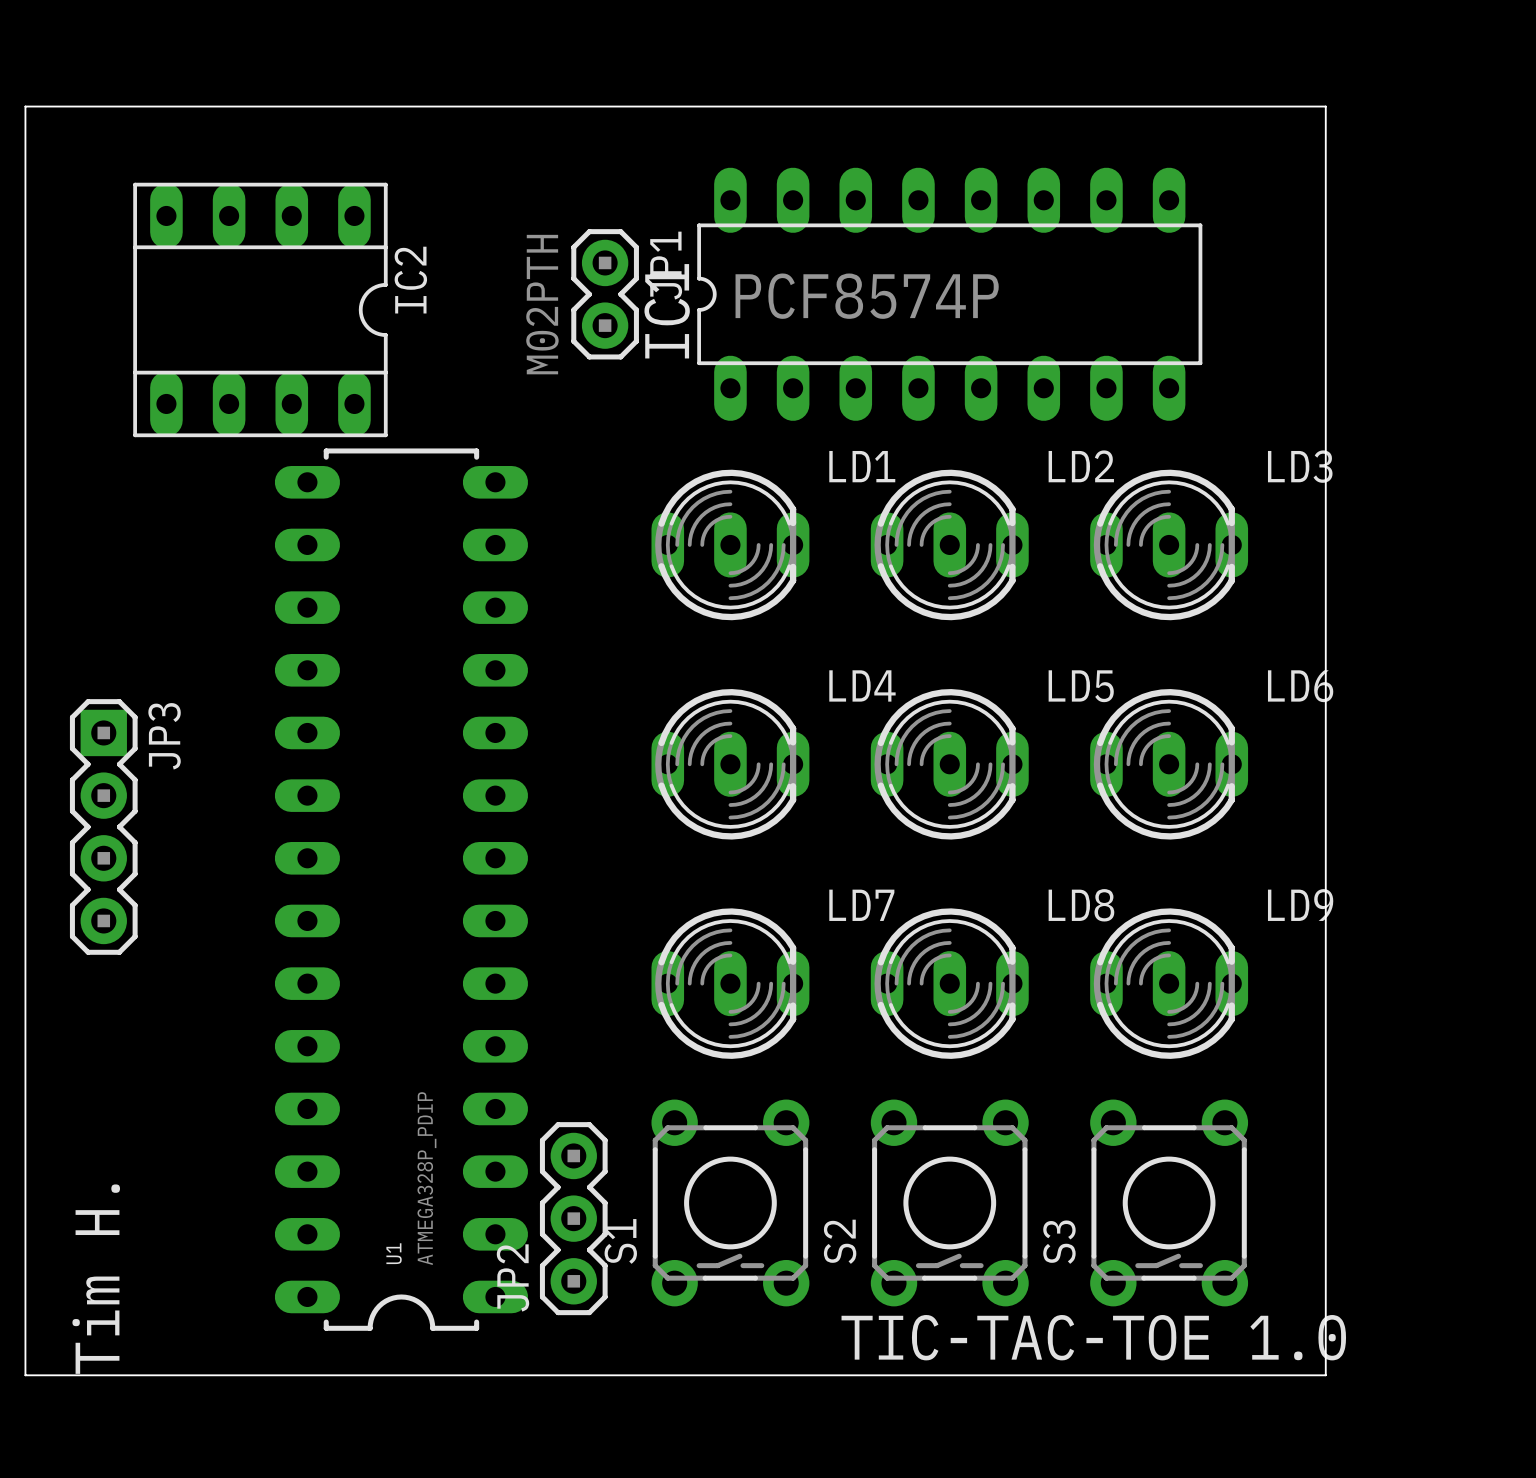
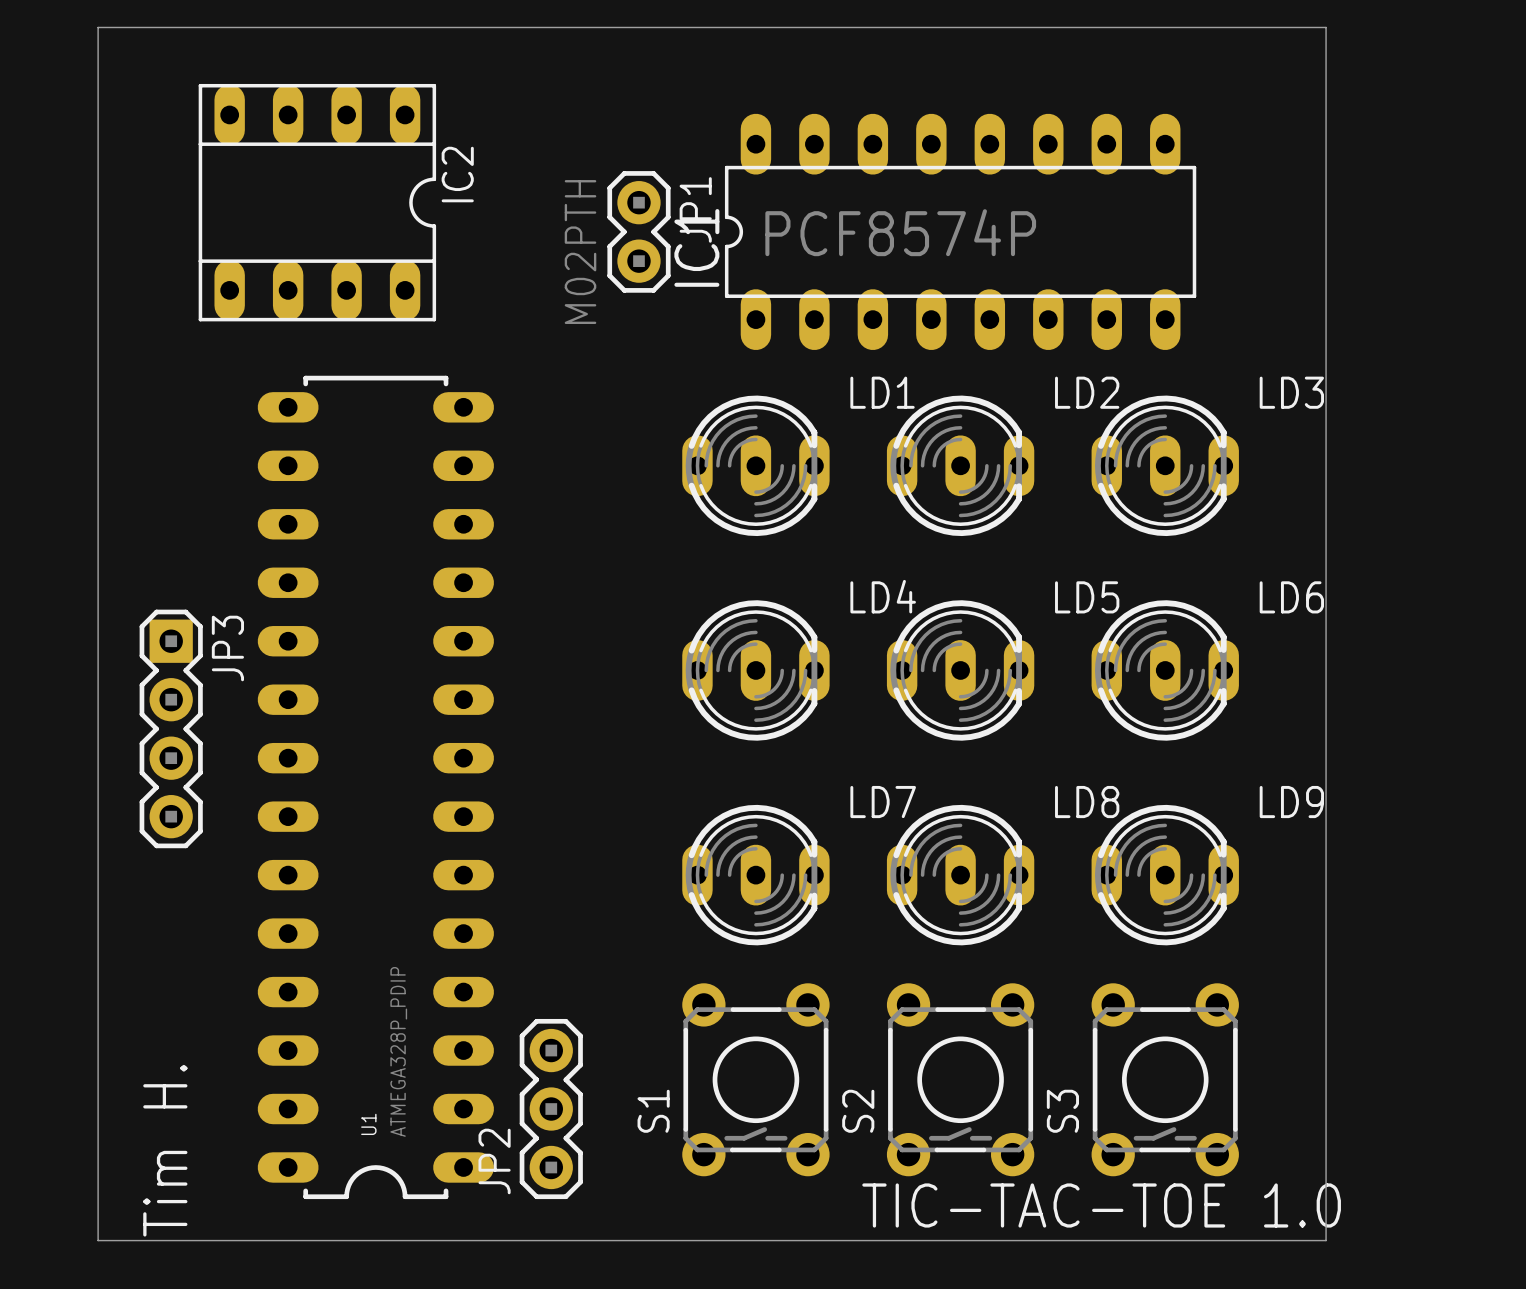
board edge: (25, 106) (1325, 106) (1325, 1375) -> (98, 56) (98, 27) (1326, 27) (1326, 1240) (1311, 1240)
IC2 position: (260, 309) -> (317, 202)
U1 position: (401, 889) -> (375, 787)
JP2 position: (573, 1218) -> (551, 1109)

